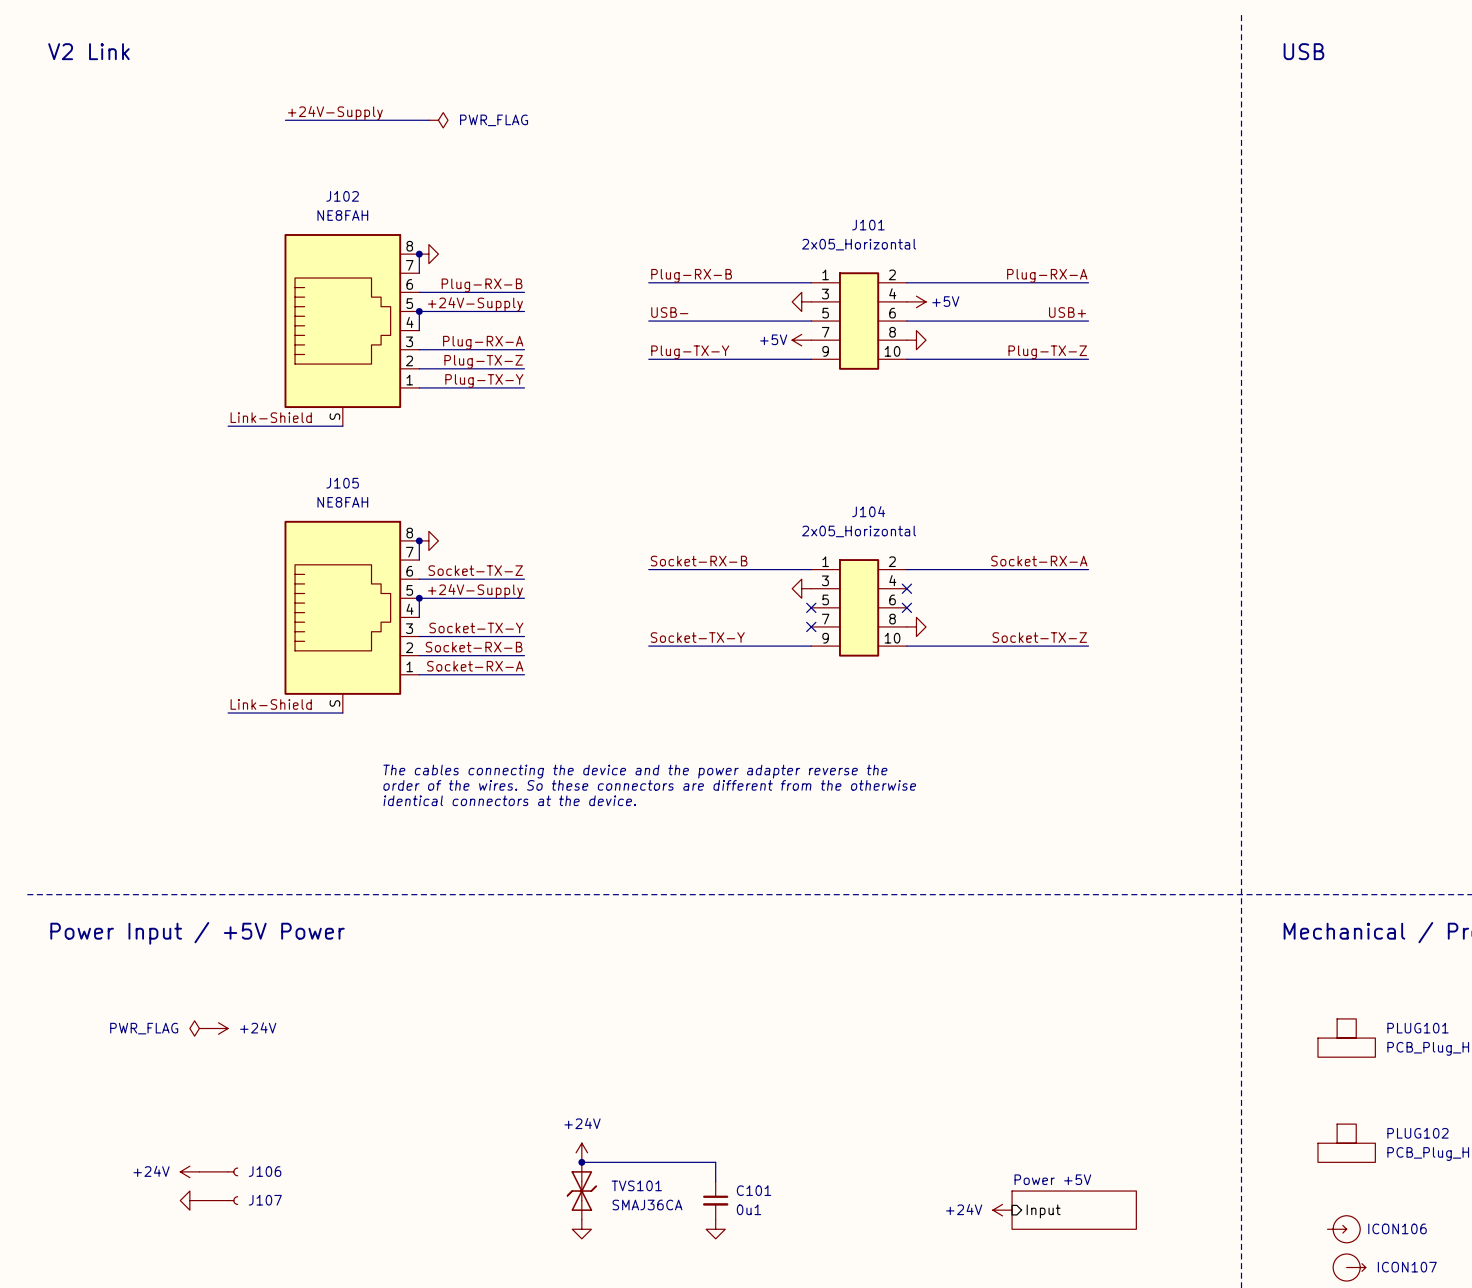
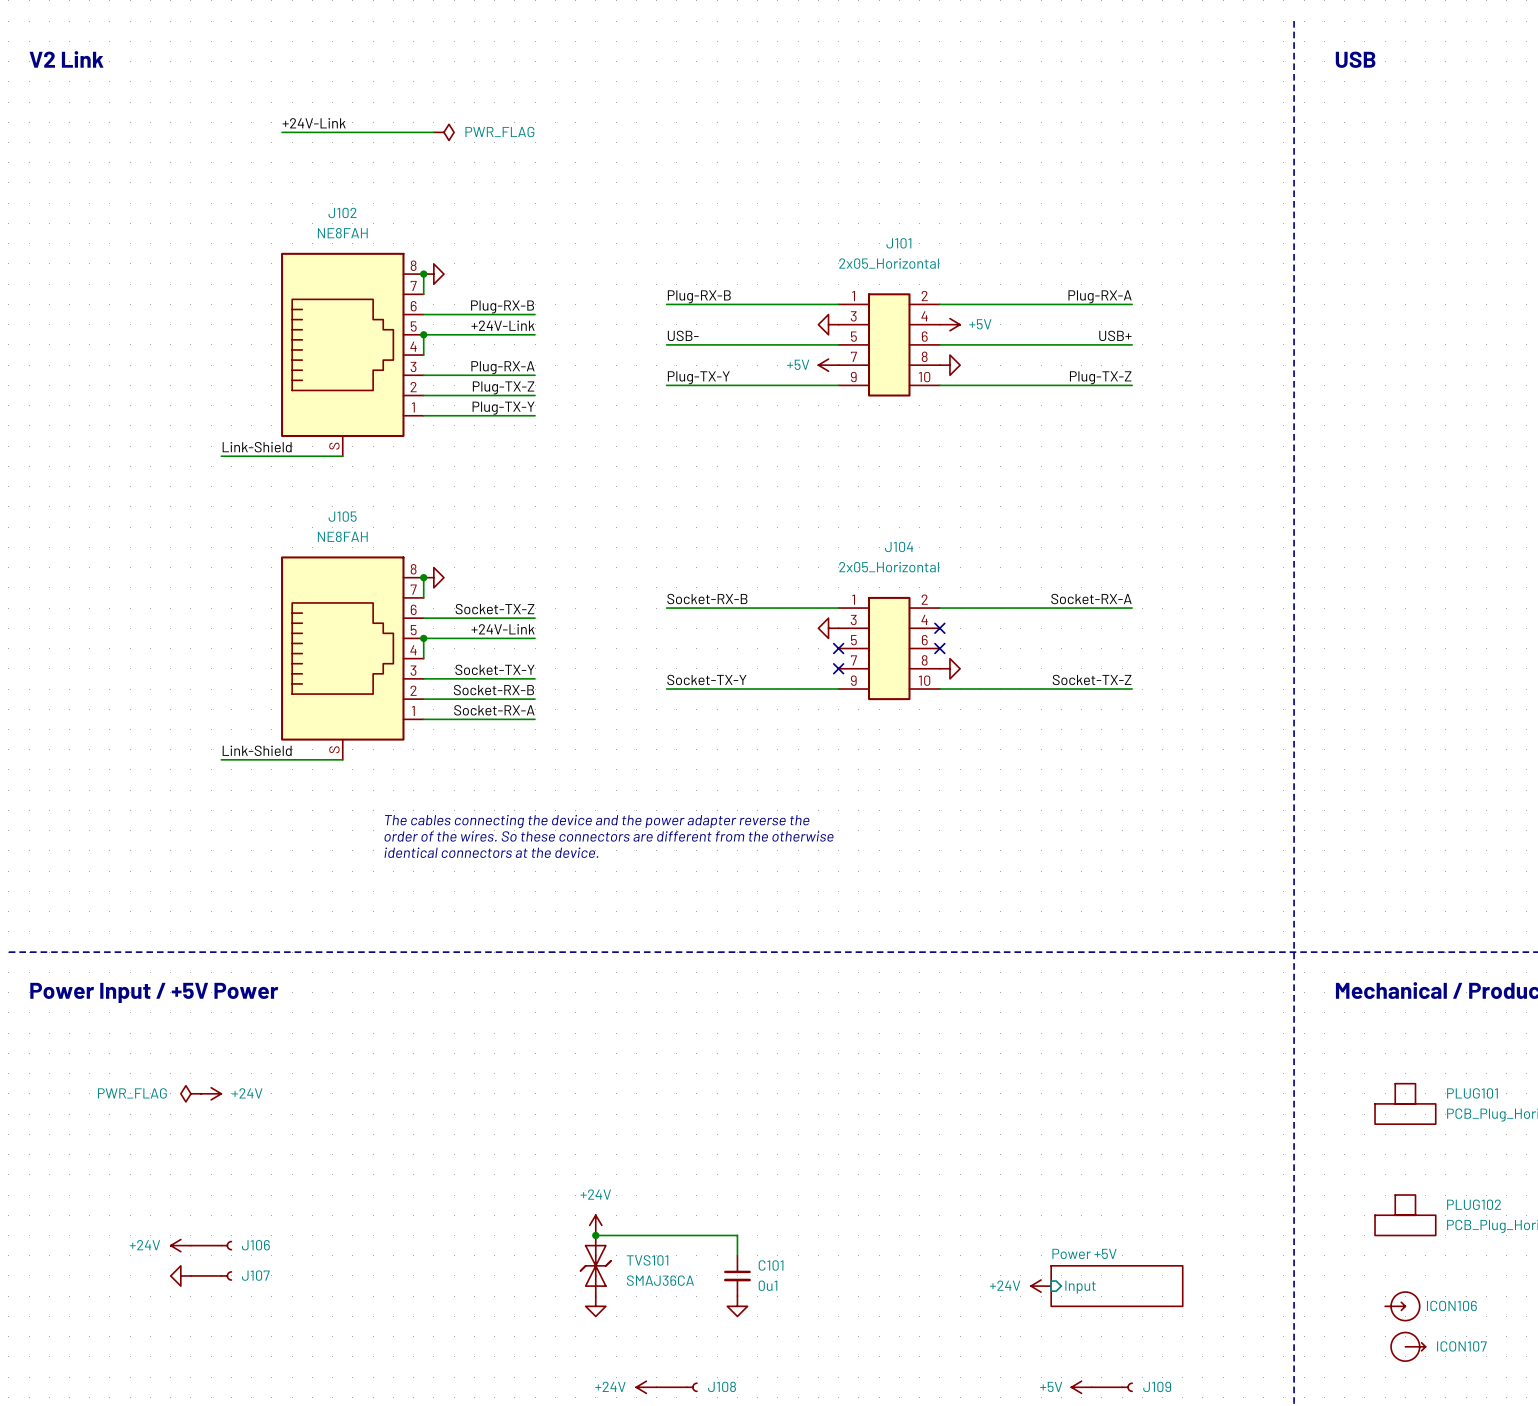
label: +24V-Supply (335, 113) -> +24V-Link (314, 123)
label: +24V-Supply (475, 304) -> +24V-Link (503, 325)
label: +24V-Supply (475, 591) -> +24V-Link (503, 629)

